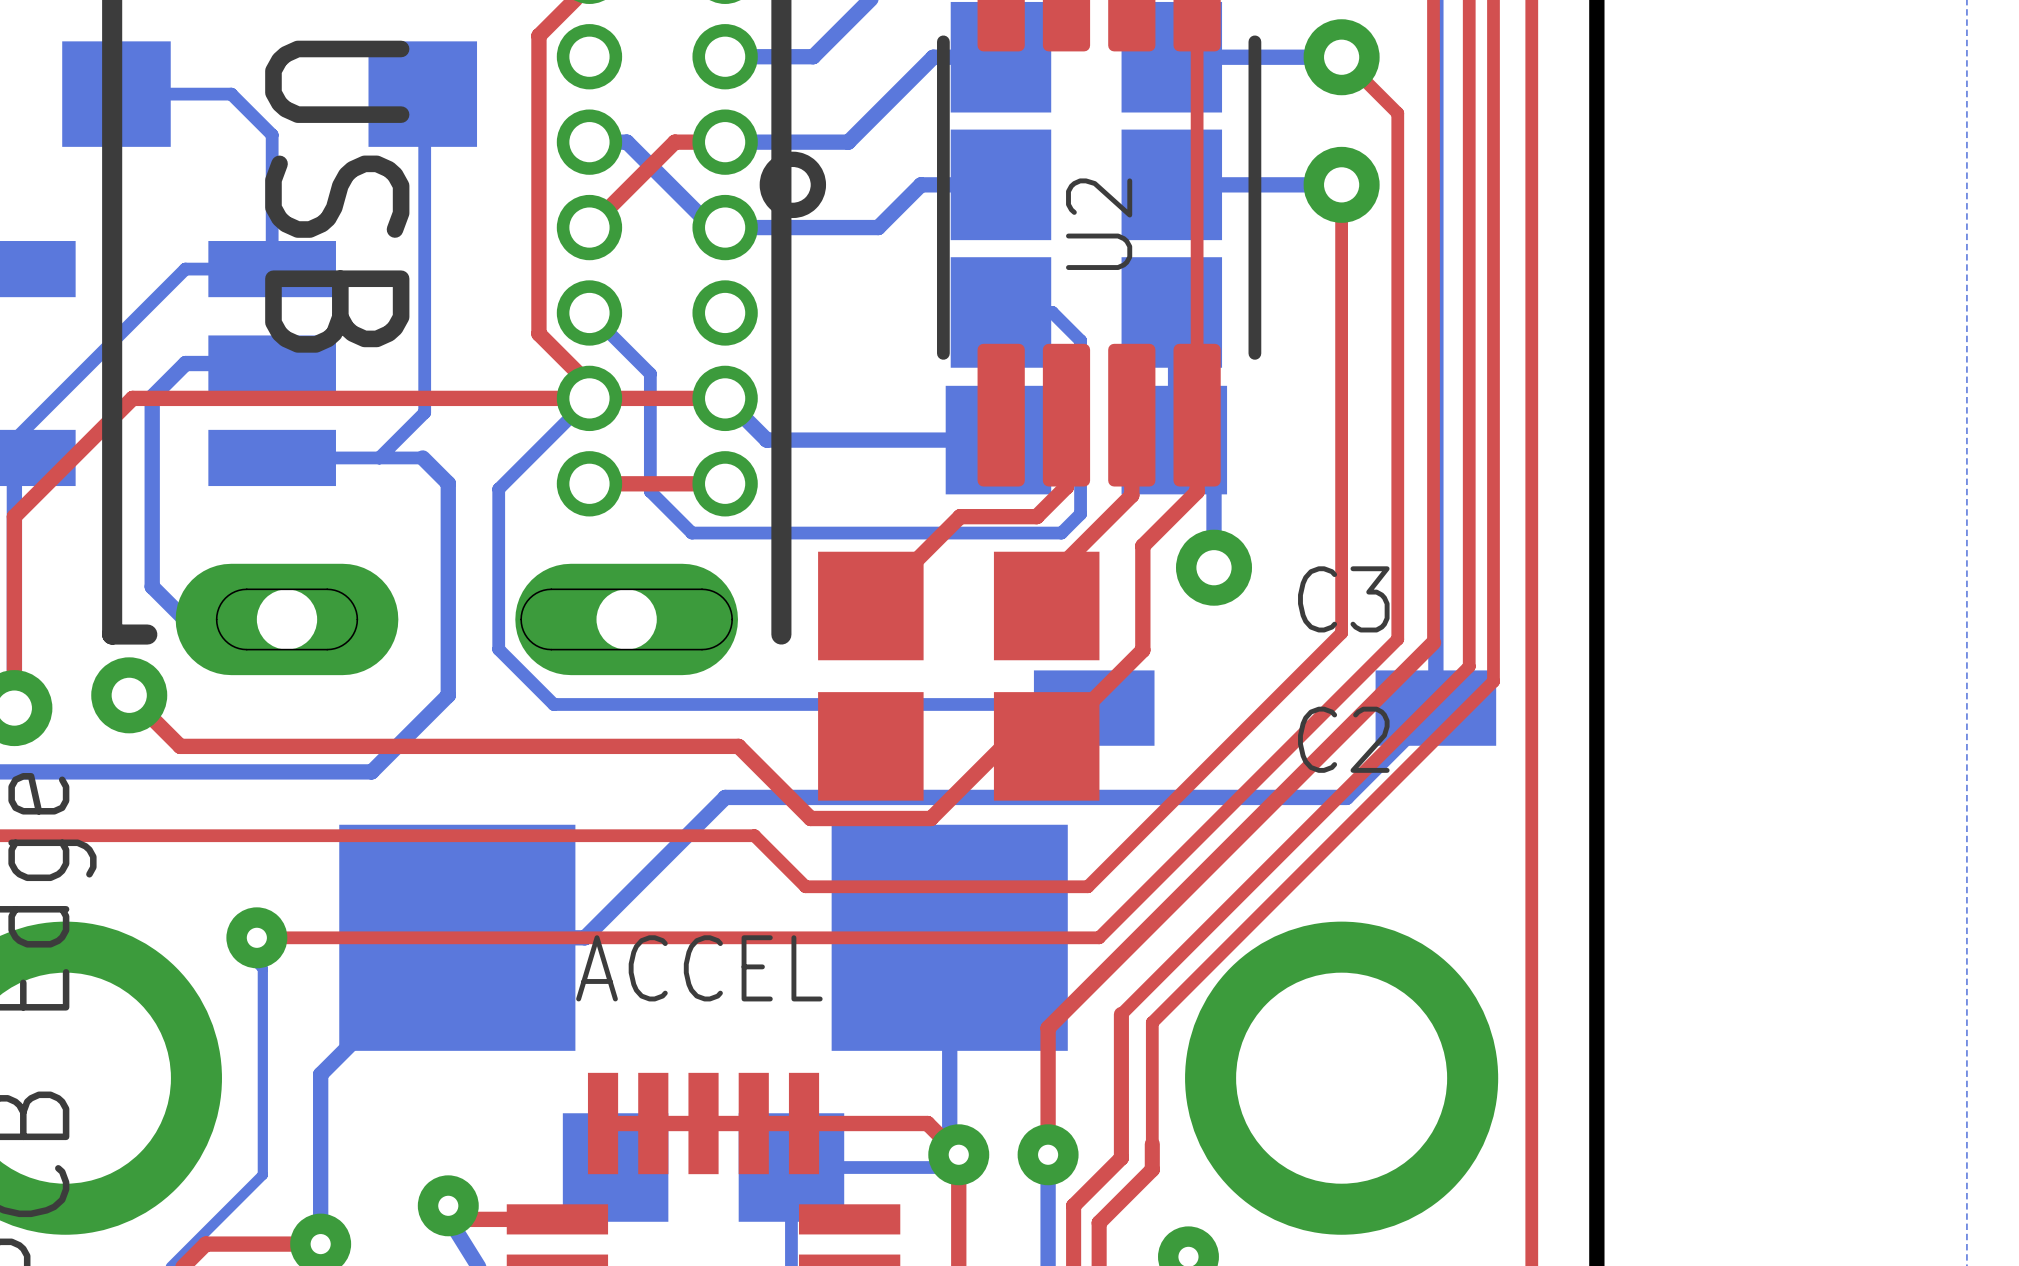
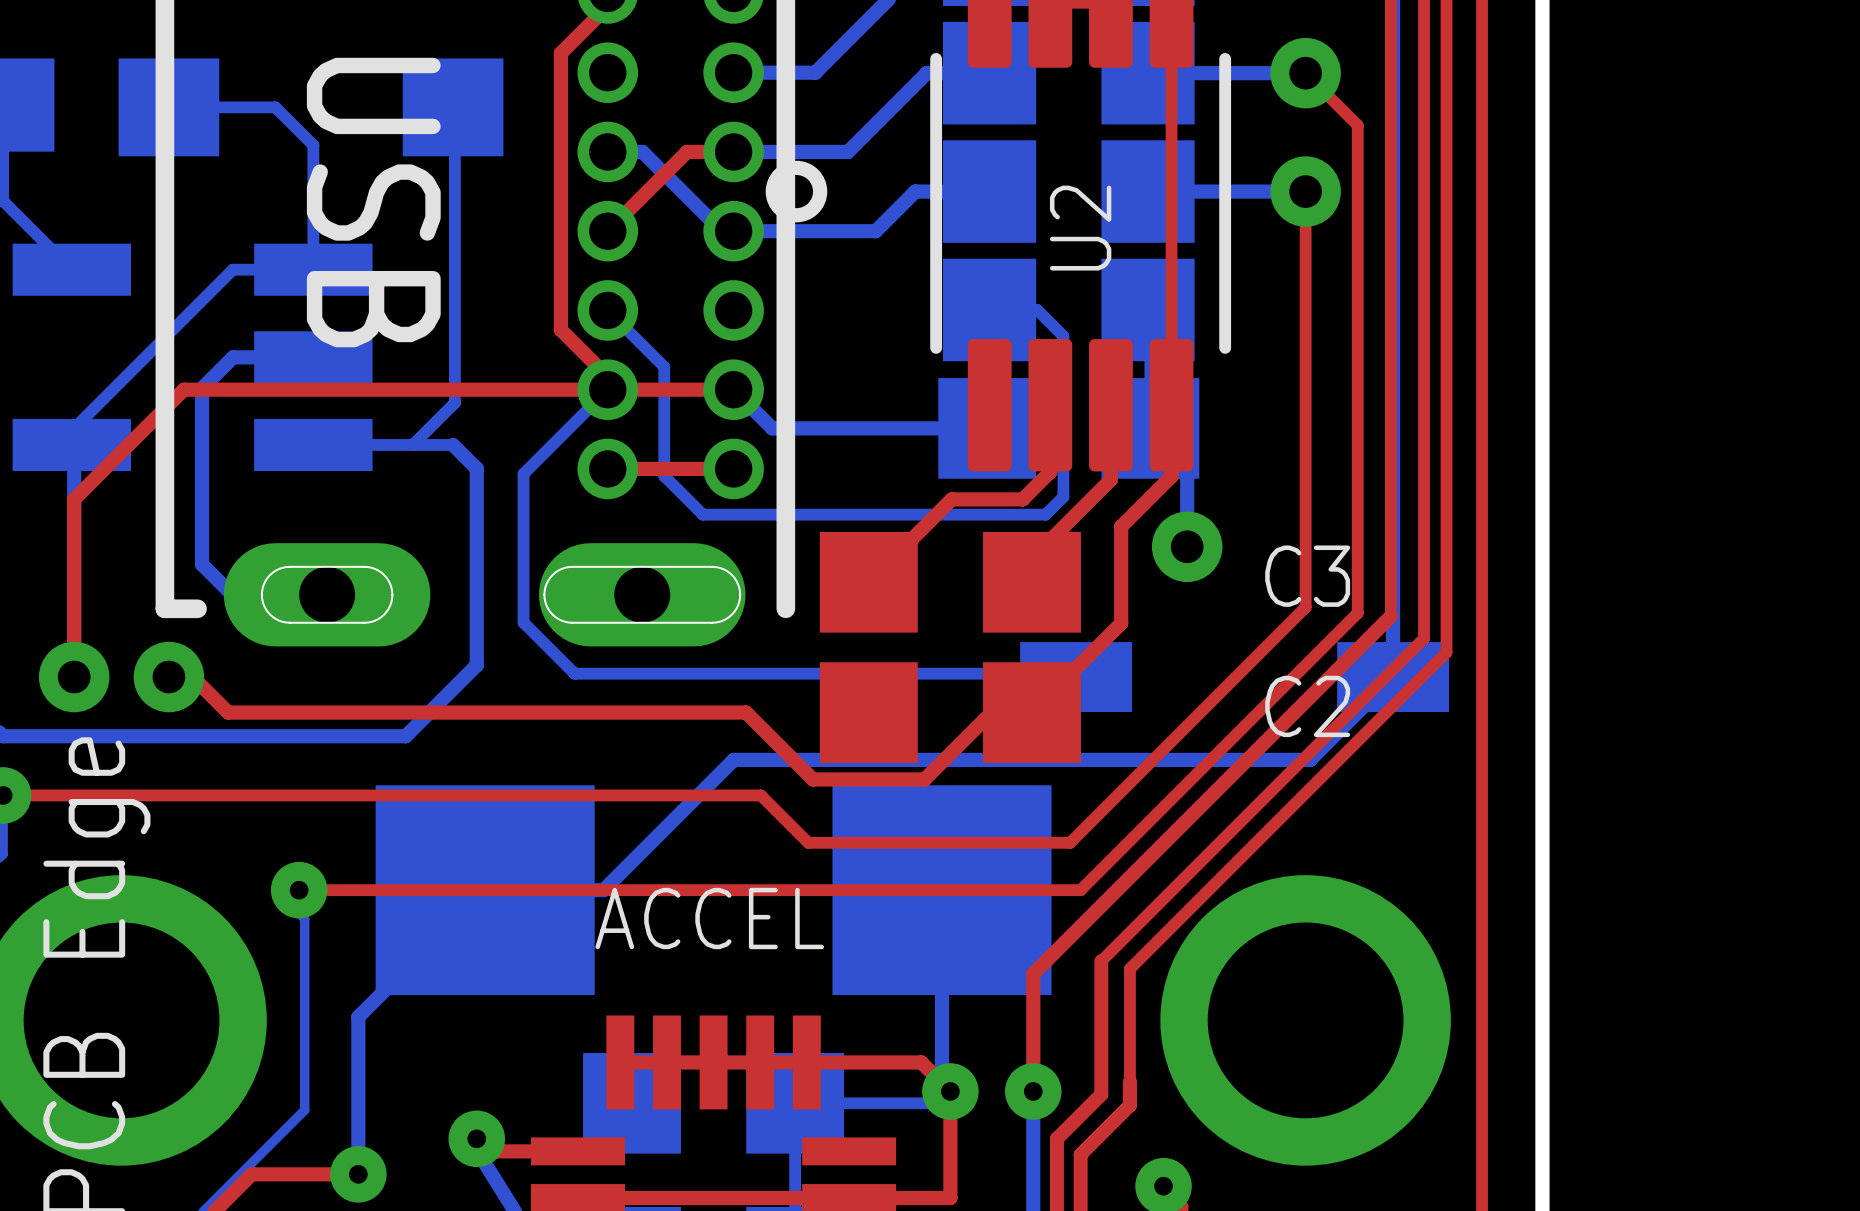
via position: (129, 695) -> (168, 677)

